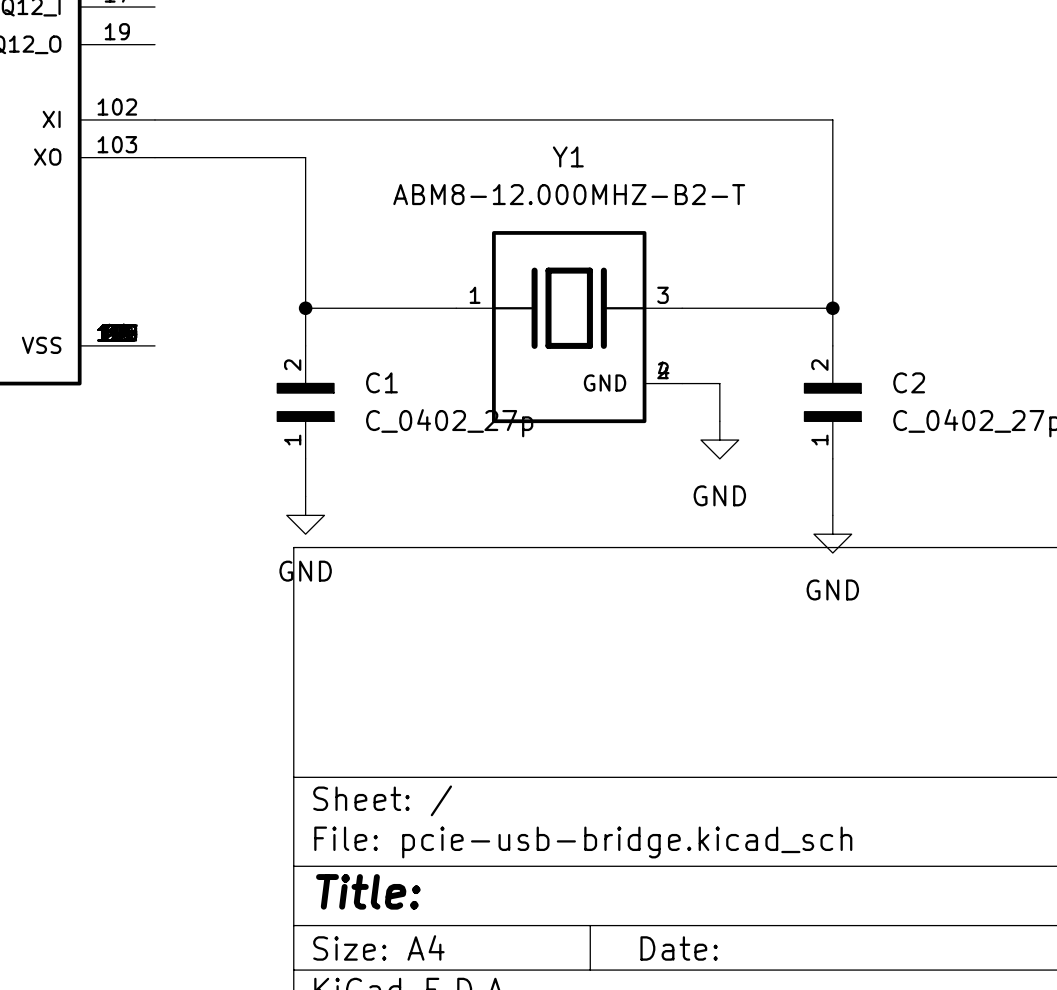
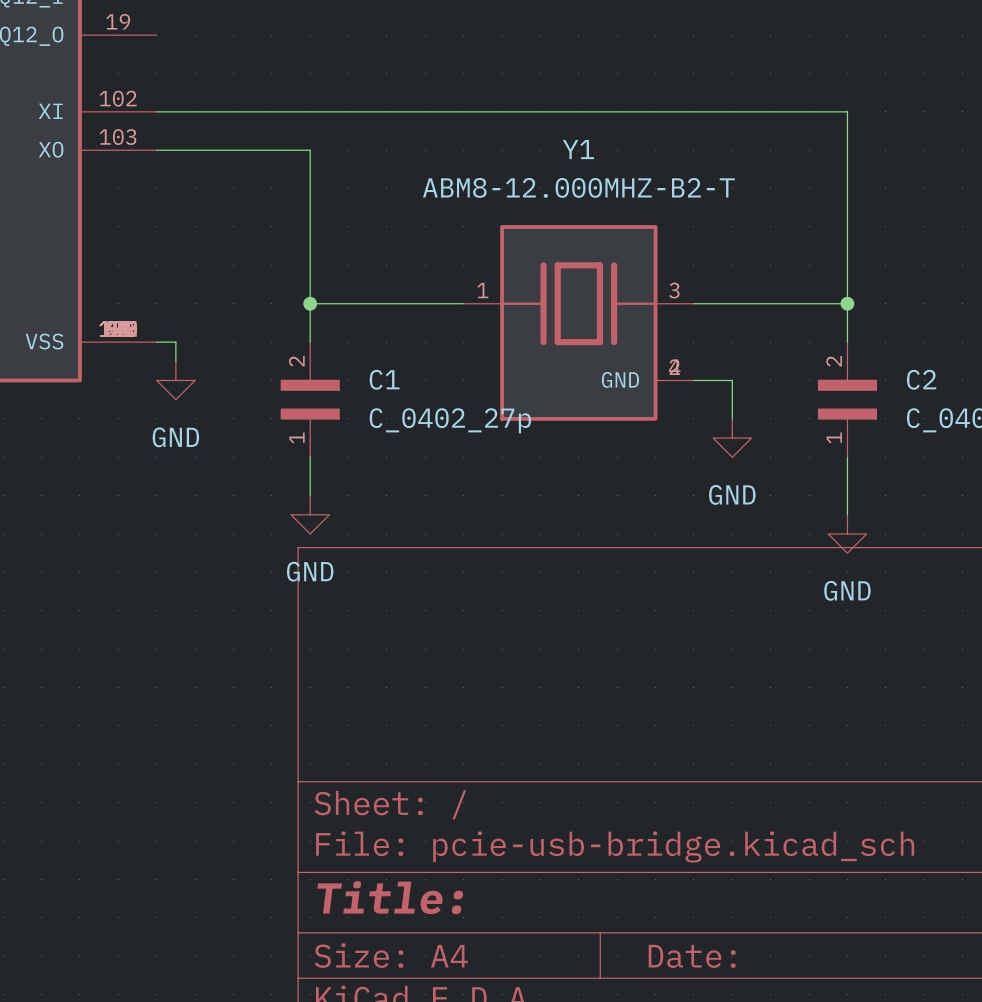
wire: none -> (156, 342) (175, 342) (175, 361)
power symbol: none -> GND (175, 380)

